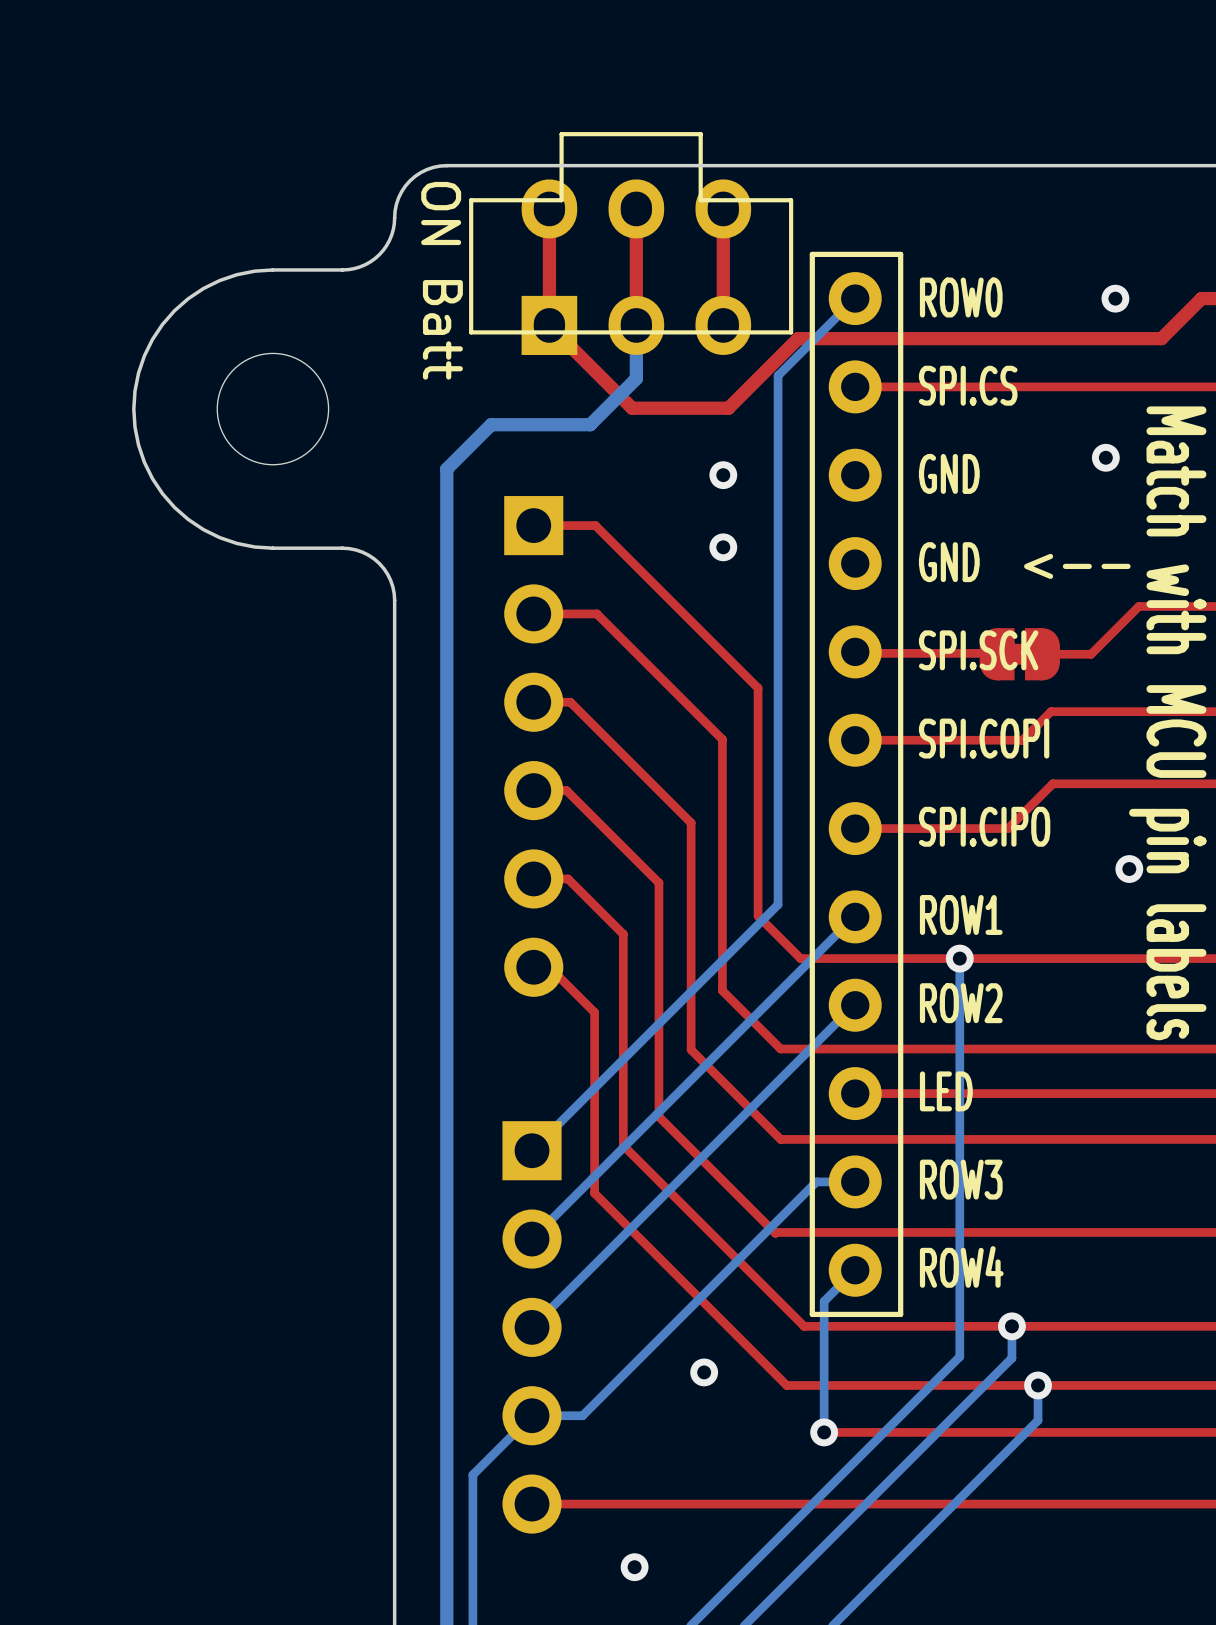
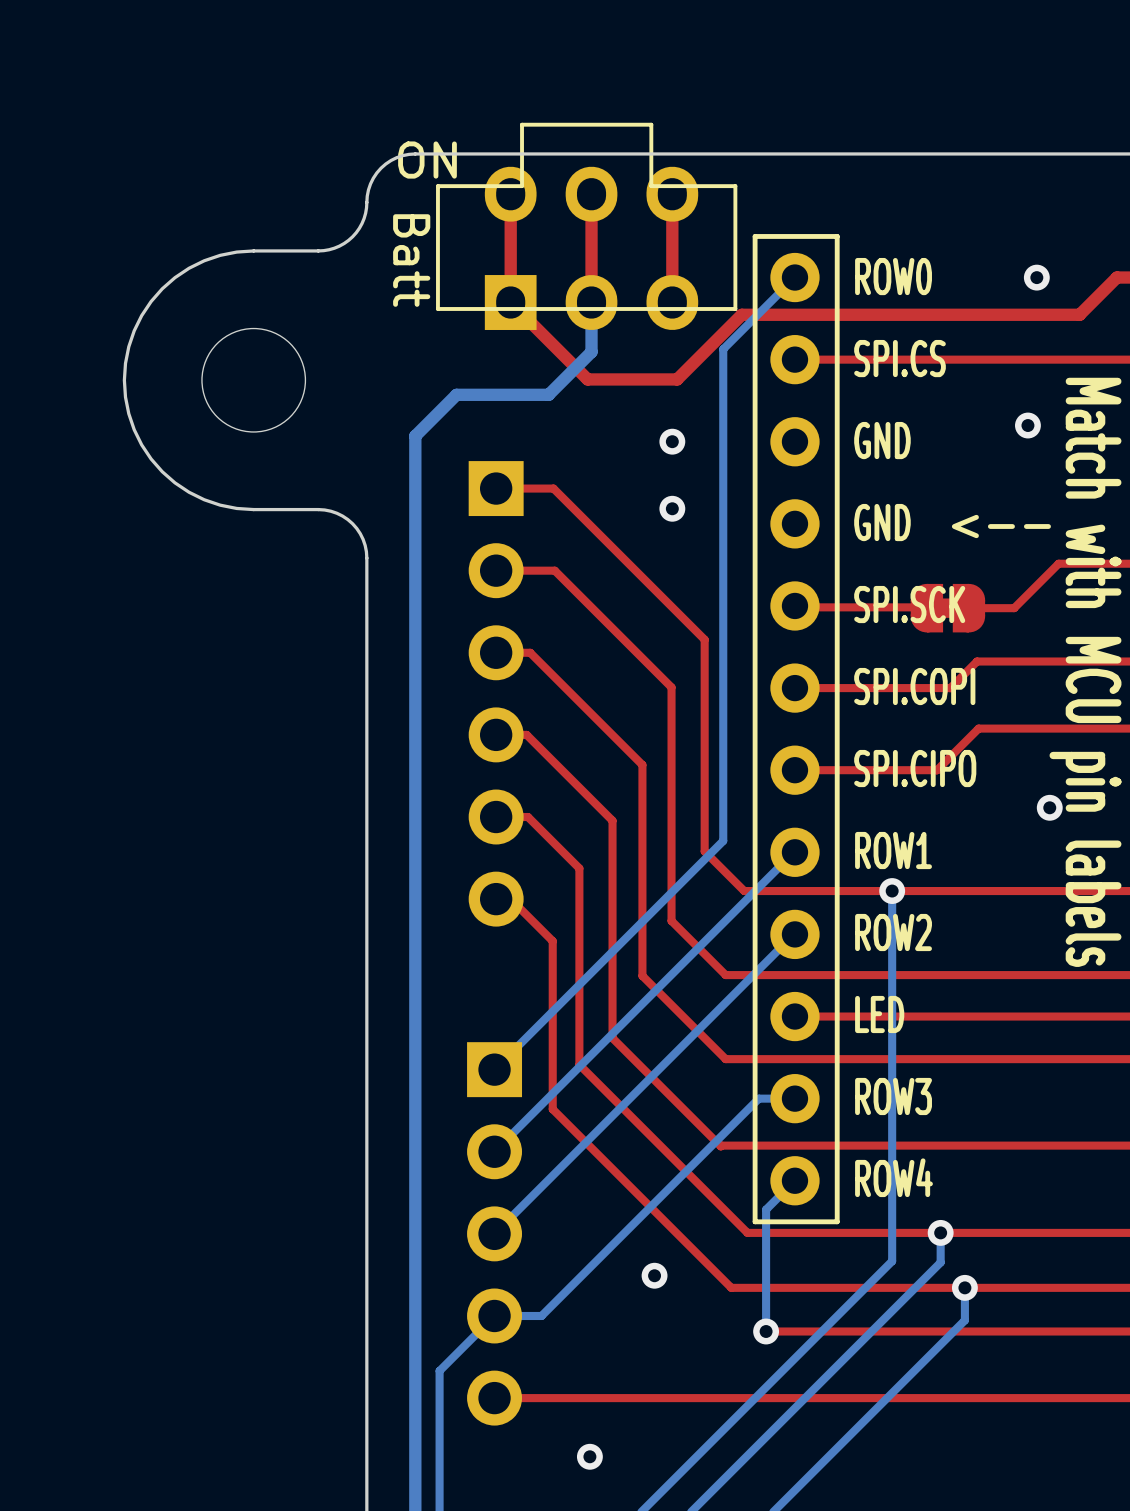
part text rotation: 0° (441, 213) -> 90° counterclockwise (427, 160)
part text position: Batt (442, 329) -> Batt (411, 260)

